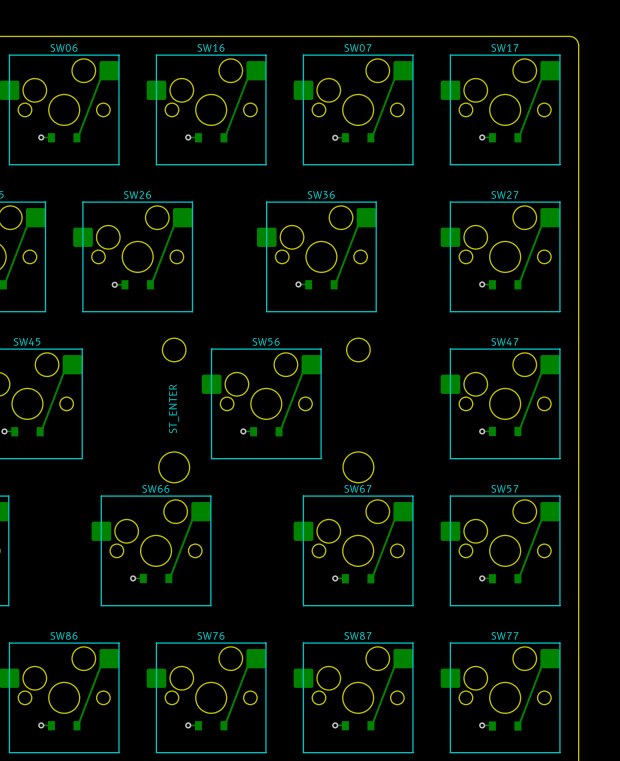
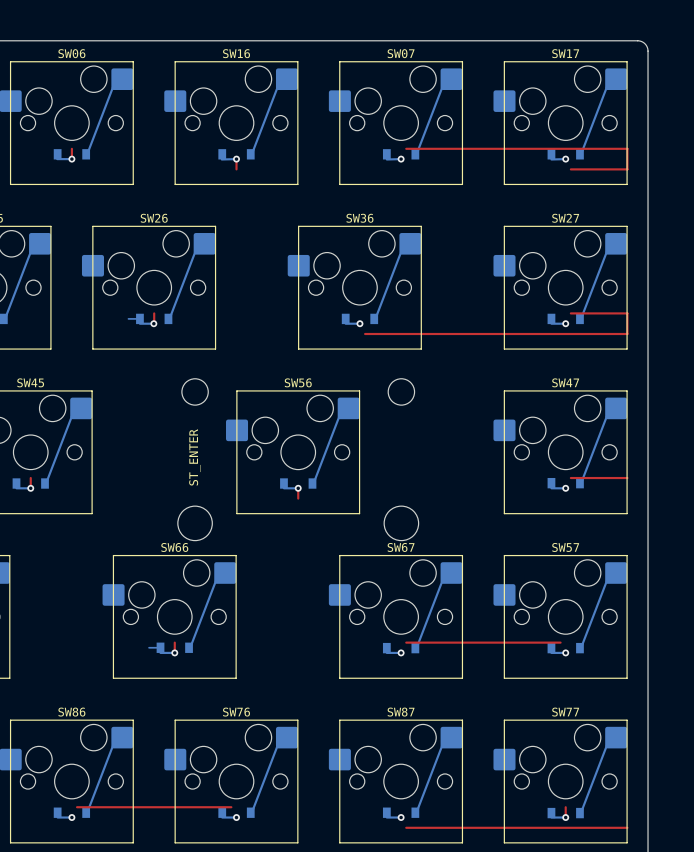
top track: none -> (71, 148) (71, 159)
top track: none -> (406, 148) (627, 148) (627, 169) (570, 169)
bottom track: (41, 137) (50, 137) -> none
via position: (41, 137) -> (71, 159)
bottom track: (188, 137) (197, 137) -> none
via position: (188, 137) -> (236, 159)
bottom track: (335, 137) (344, 137) -> none
via position: (335, 137) -> (401, 159)
bottom track: (482, 137) (491, 137) -> none
via position: (482, 137) -> (565, 159)
bottom track: none -> (57, 159) (71, 159)
bottom track: none -> (236, 159) (221, 159)
top track: none -> (236, 159) (236, 169)
bottom track: none -> (401, 159) (386, 159)
bottom track: none -> (565, 159) (551, 159)
top track: none -> (154, 313) (154, 323)
top track: none -> (570, 313) (627, 313) (627, 333) (365, 333)
via position: (114, 284) -> (153, 323)
bottom track: (298, 284) (307, 284) -> none
via position: (298, 284) -> (359, 323)
bottom track: (482, 284) (491, 284) -> none
via position: (482, 284) -> (565, 323)
bottom track: none -> (139, 323) (153, 323)
bottom track: none -> (345, 323) (359, 323)
bottom track: none -> (551, 323) (565, 323)
top track: none -> (30, 478) (30, 488)
top track: none -> (570, 478) (627, 478)
bottom track: (4, 431) (13, 431) -> none
via position: (4, 431) -> (30, 488)
bottom track: (243, 431) (252, 431) -> none
via position: (243, 431) -> (298, 488)
bottom track: (482, 431) (491, 431) -> none
via position: (482, 431) -> (565, 488)
bottom track: none -> (16, 488) (30, 488)
bottom track: none -> (283, 488) (298, 488)
top track: none -> (298, 488) (298, 498)
bottom track: none -> (551, 488) (565, 488)
top track: none -> (174, 642) (174, 652)
top track: none -> (406, 642) (560, 642)
via position: (133, 578) -> (174, 652)
bottom track: (335, 578) (344, 578) -> none
via position: (335, 578) -> (401, 652)
bottom track: (482, 578) (491, 578) -> none
via position: (482, 578) -> (565, 652)
bottom track: none -> (160, 652) (174, 652)
bottom track: none -> (386, 652) (401, 652)
bottom track: none -> (551, 652) (565, 652)
top track: none -> (77, 807) (231, 807)
top track: none -> (565, 807) (565, 817)
bottom track: (41, 725) (50, 725) -> none
via position: (41, 725) -> (71, 817)
bottom track: (188, 725) (197, 725) -> none
via position: (188, 725) -> (236, 817)
bottom track: (335, 725) (344, 725) -> none
via position: (335, 725) -> (401, 817)
bottom track: (482, 725) (491, 725) -> none
via position: (482, 725) -> (565, 817)
bottom track: none -> (57, 817) (71, 817)
bottom track: none -> (222, 817) (236, 817)
bottom track: none -> (386, 817) (401, 817)
bottom track: none -> (551, 817) (565, 817)
top track: none -> (406, 827) (627, 827)

